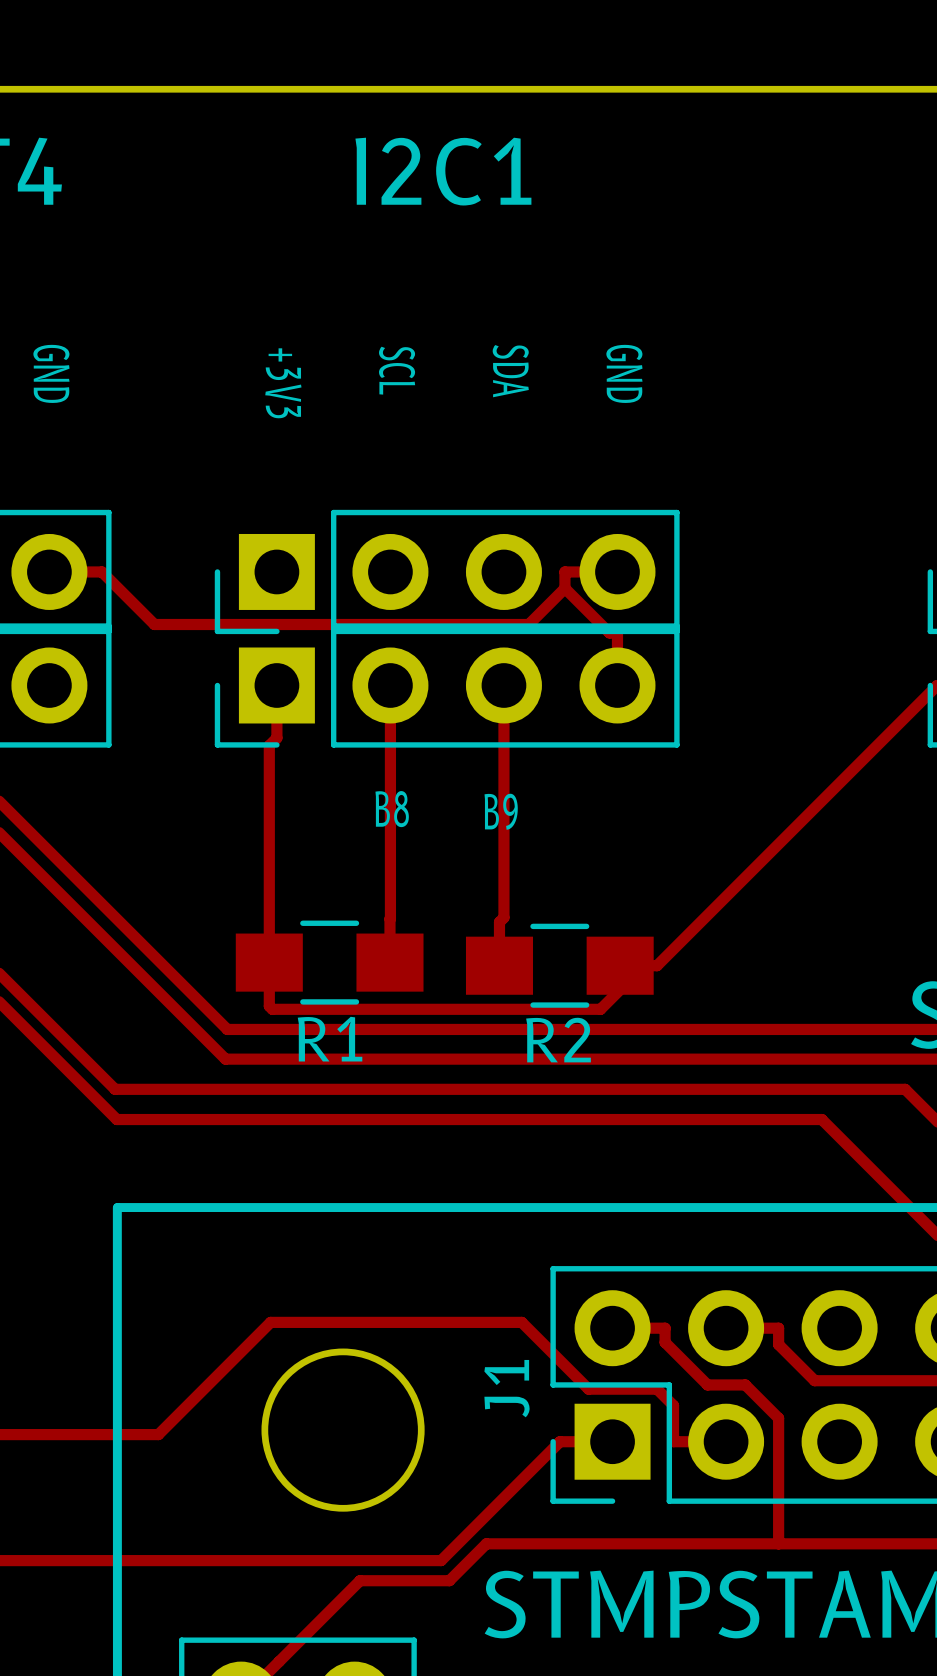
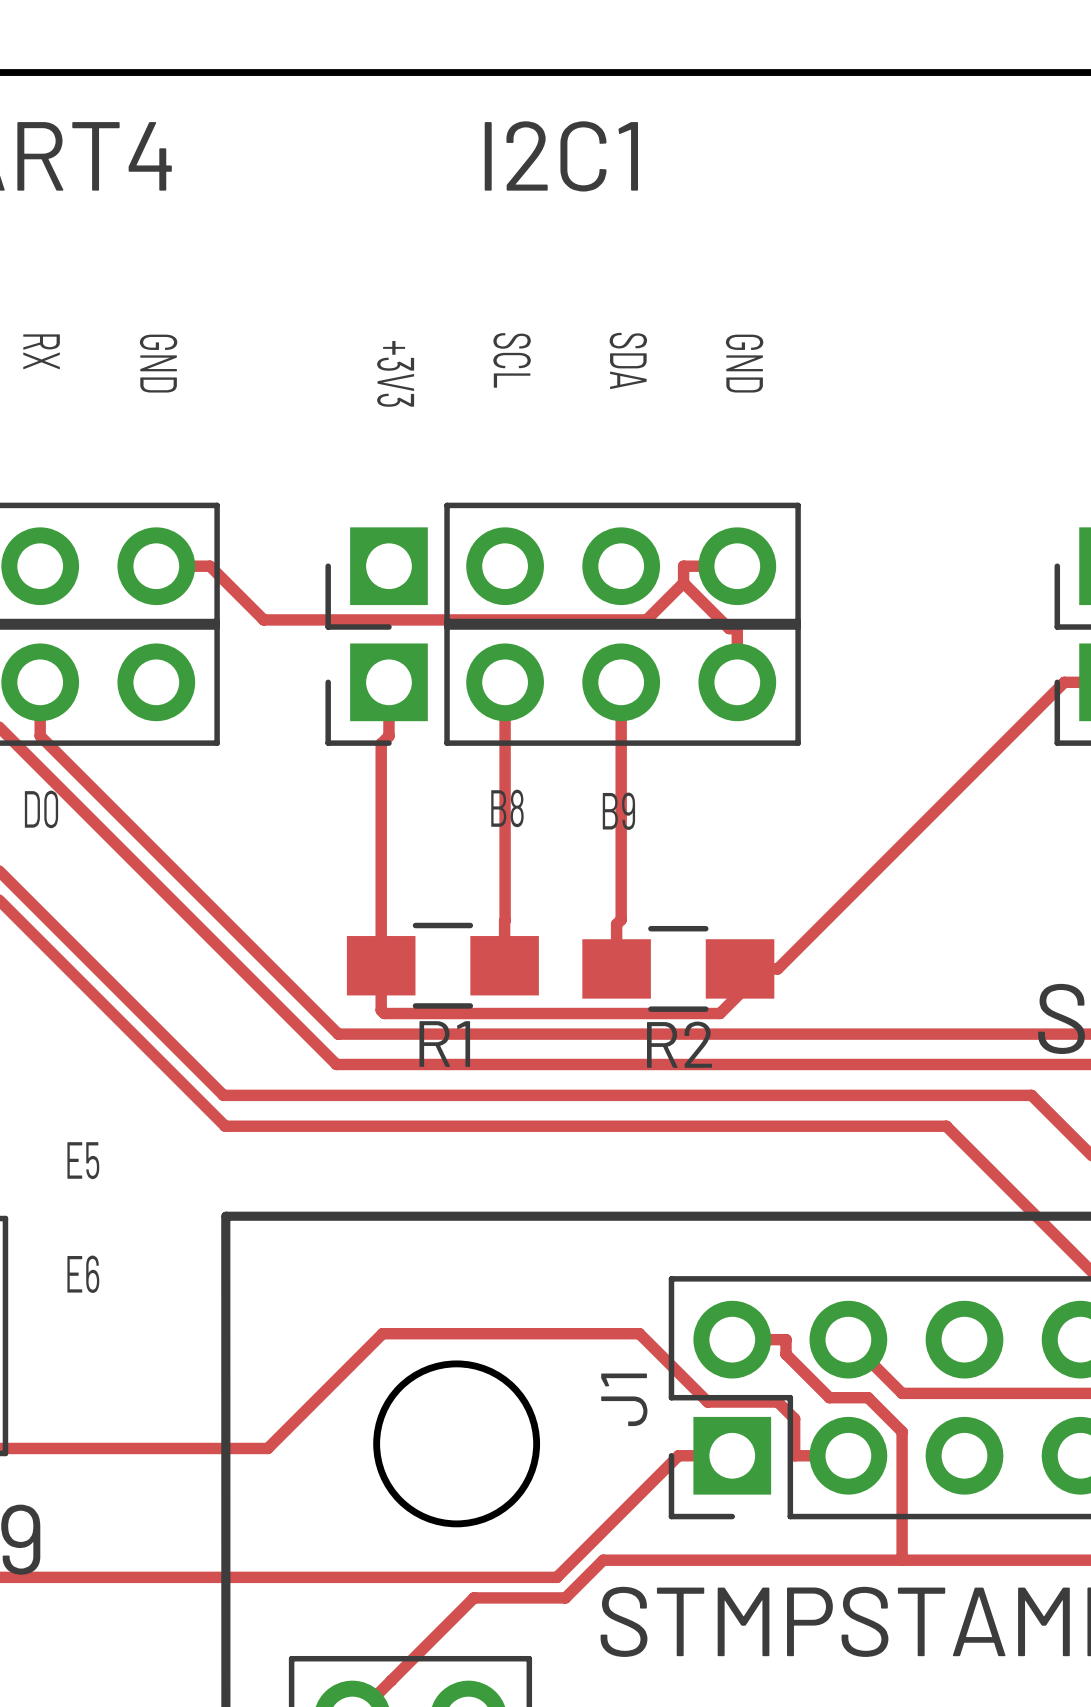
track: (726, 1328) (778, 1328) (778, 1344) (814, 1380) -> (848, 1339) (902, 1393) (939, 1393)

